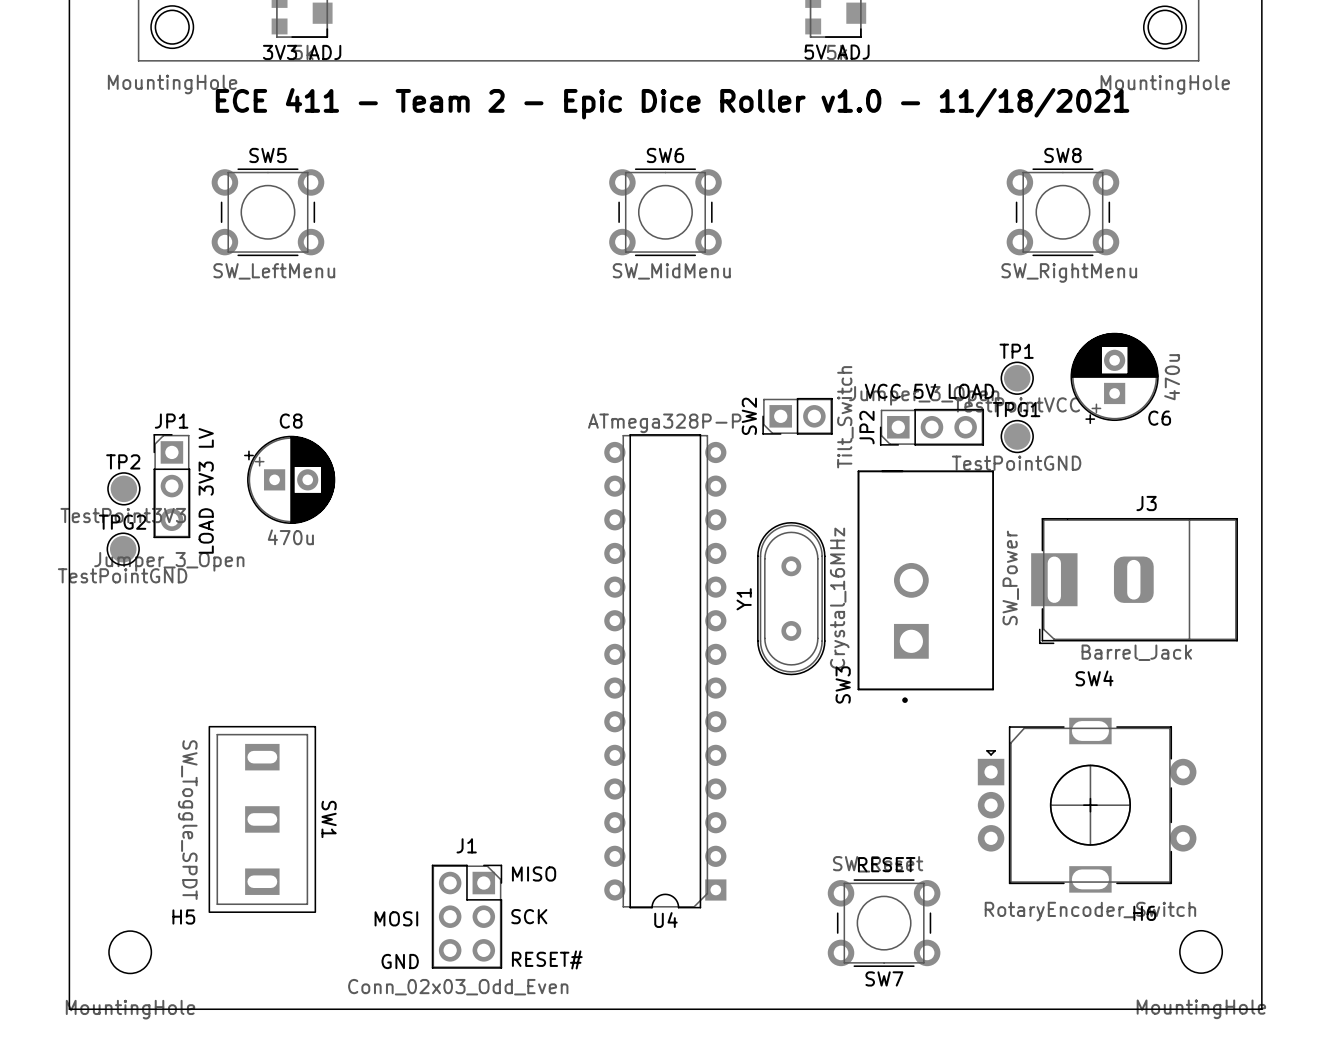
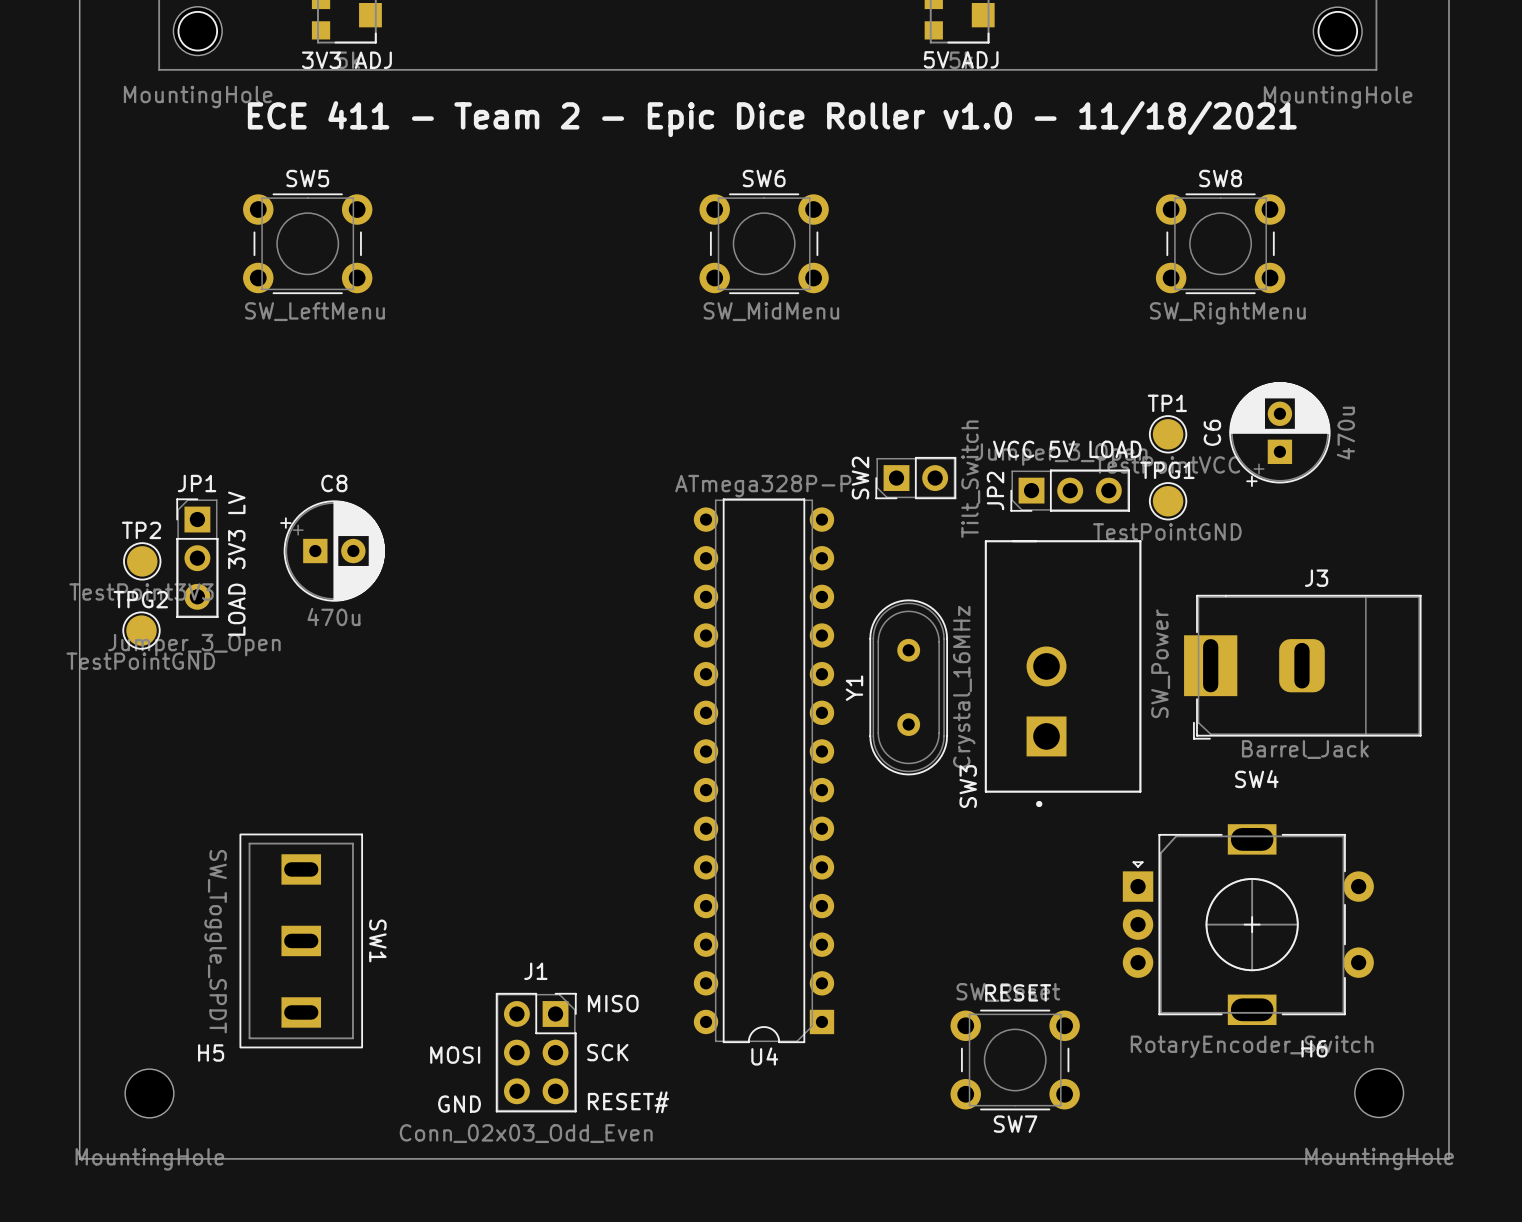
C6 name rotation: 0° (1159, 418) -> 90° counterclockwise (1212, 432)
C6 name position: C6 (1159, 418) -> C6 (1212, 432)

